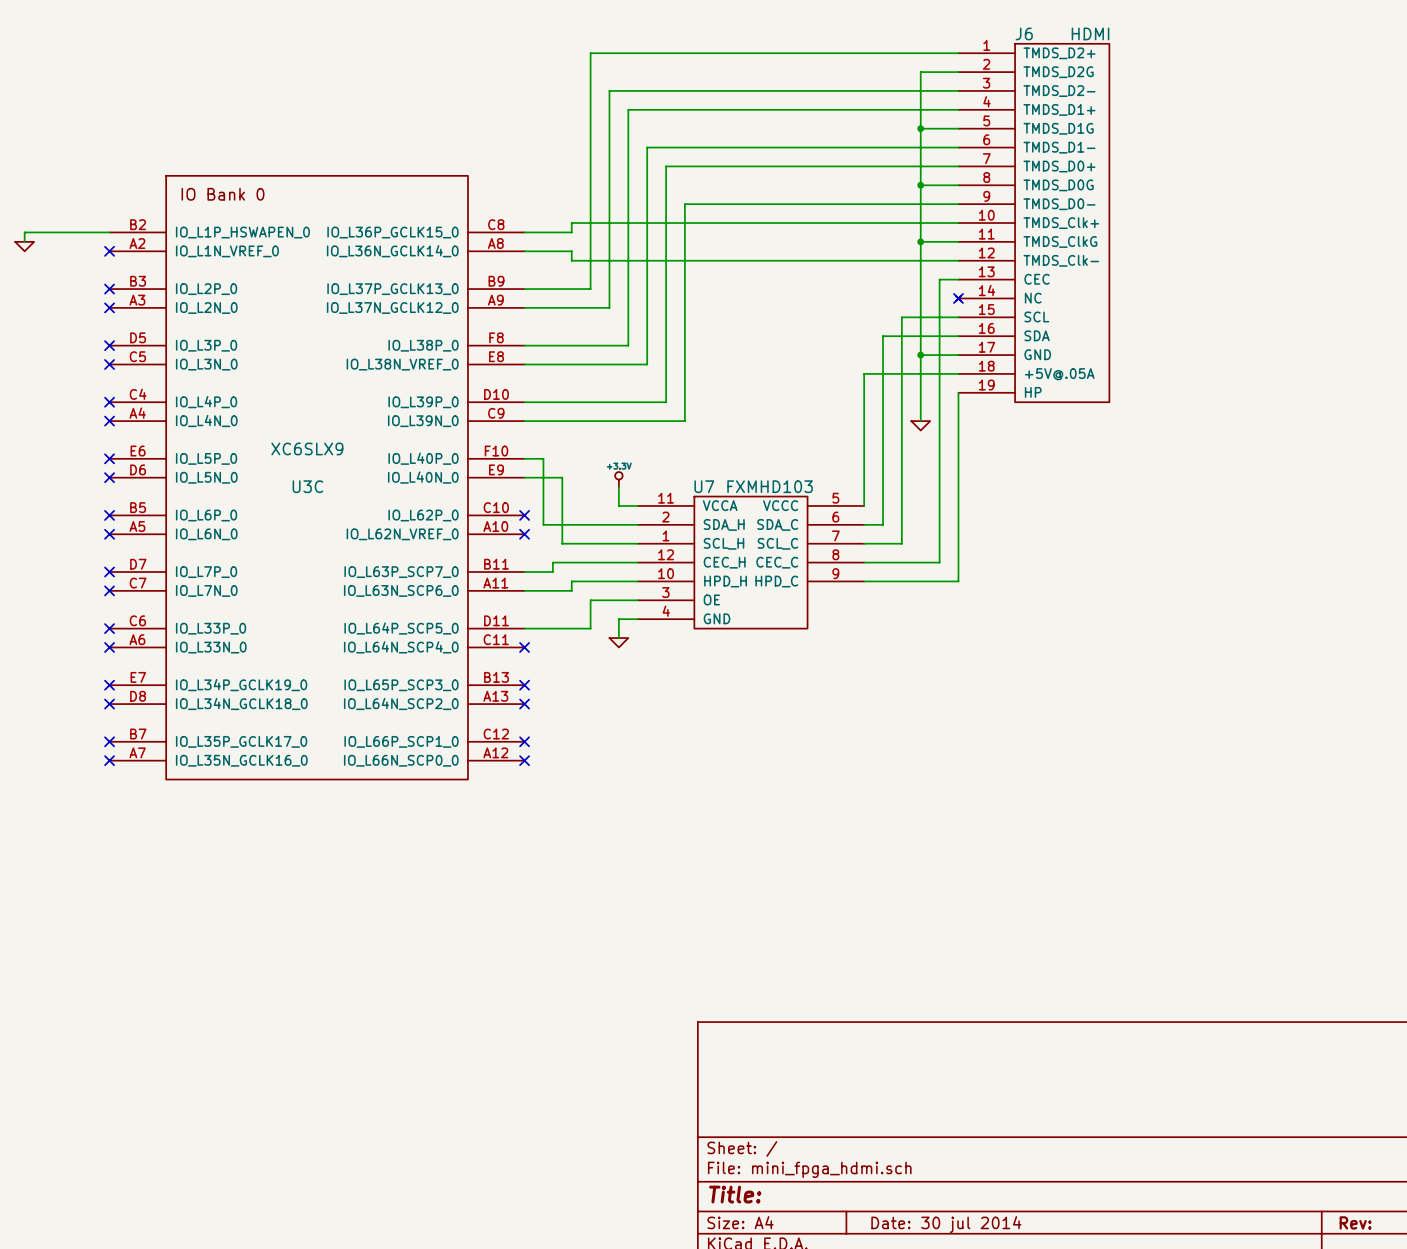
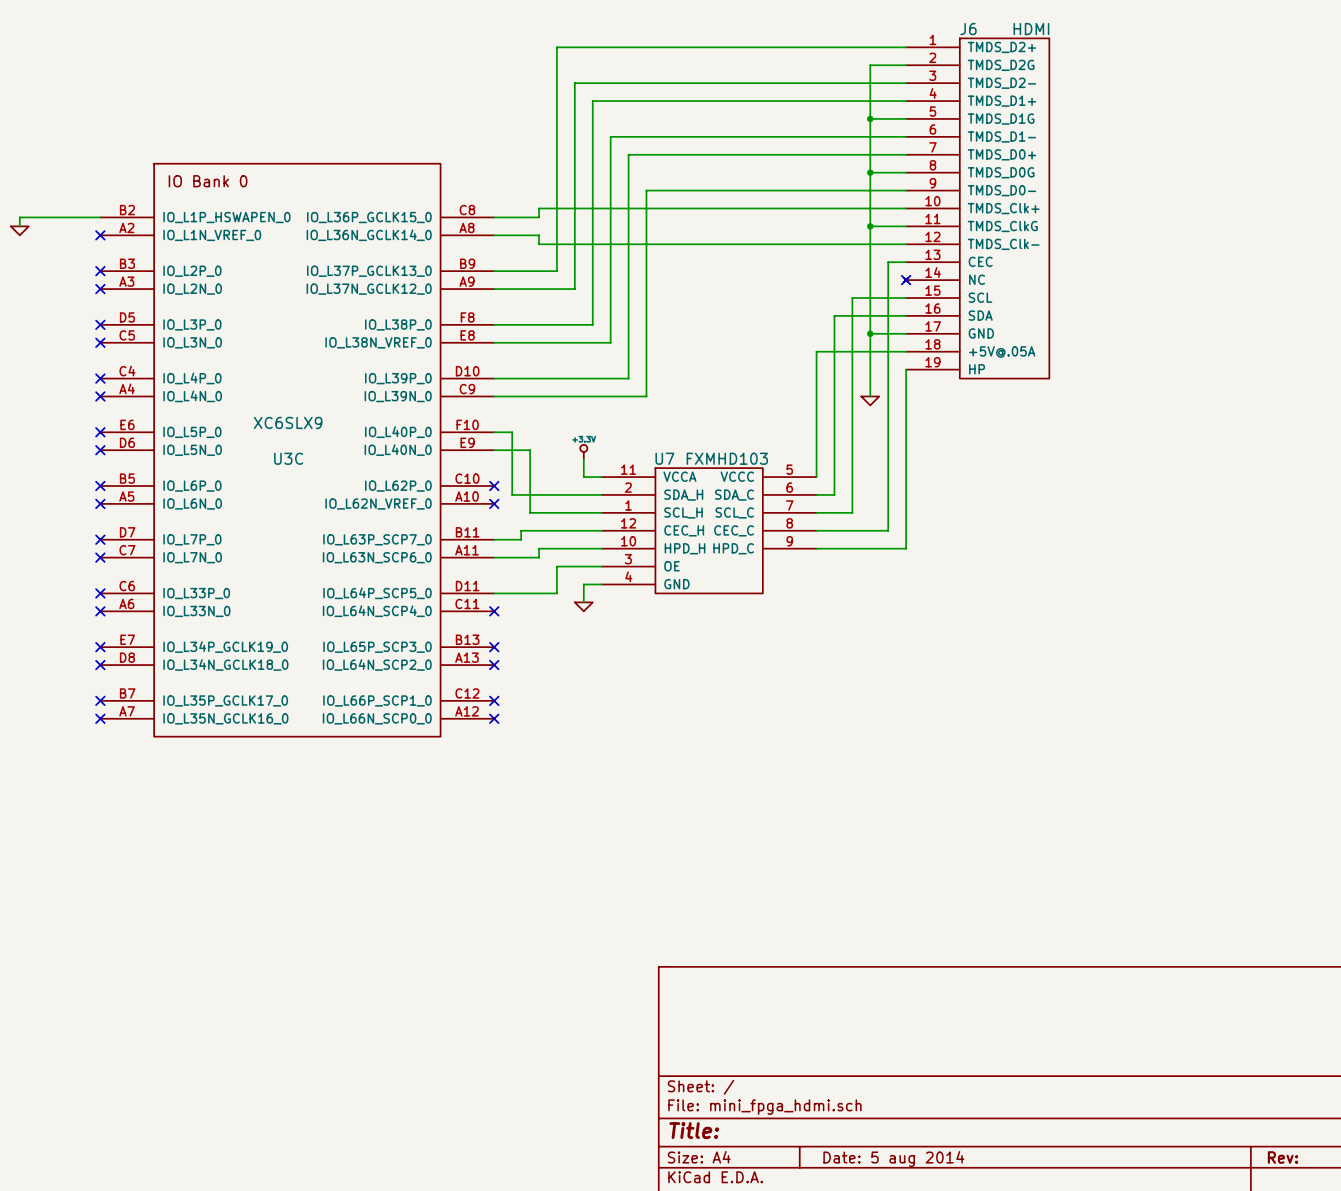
title block: Date: 30 jul 2014 (946, 1224) -> Date: 5 aug 2014 (893, 1159)

